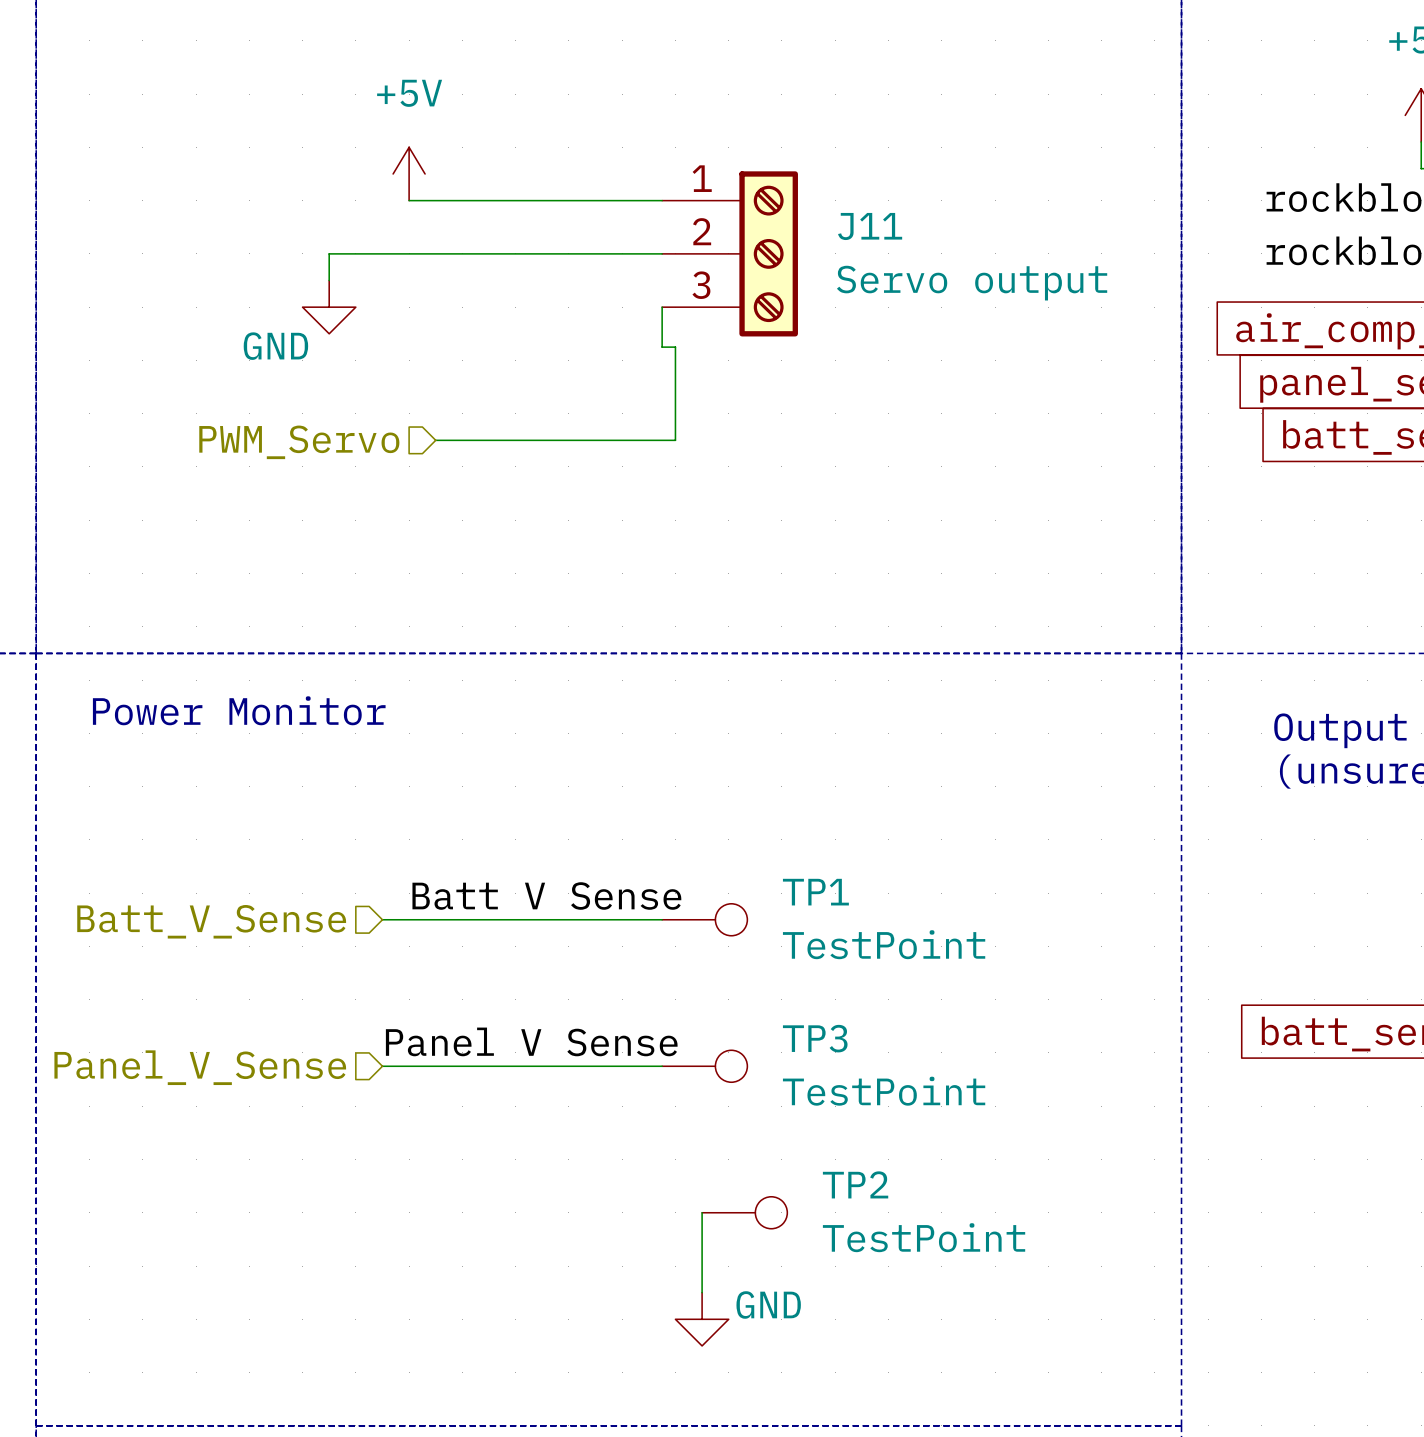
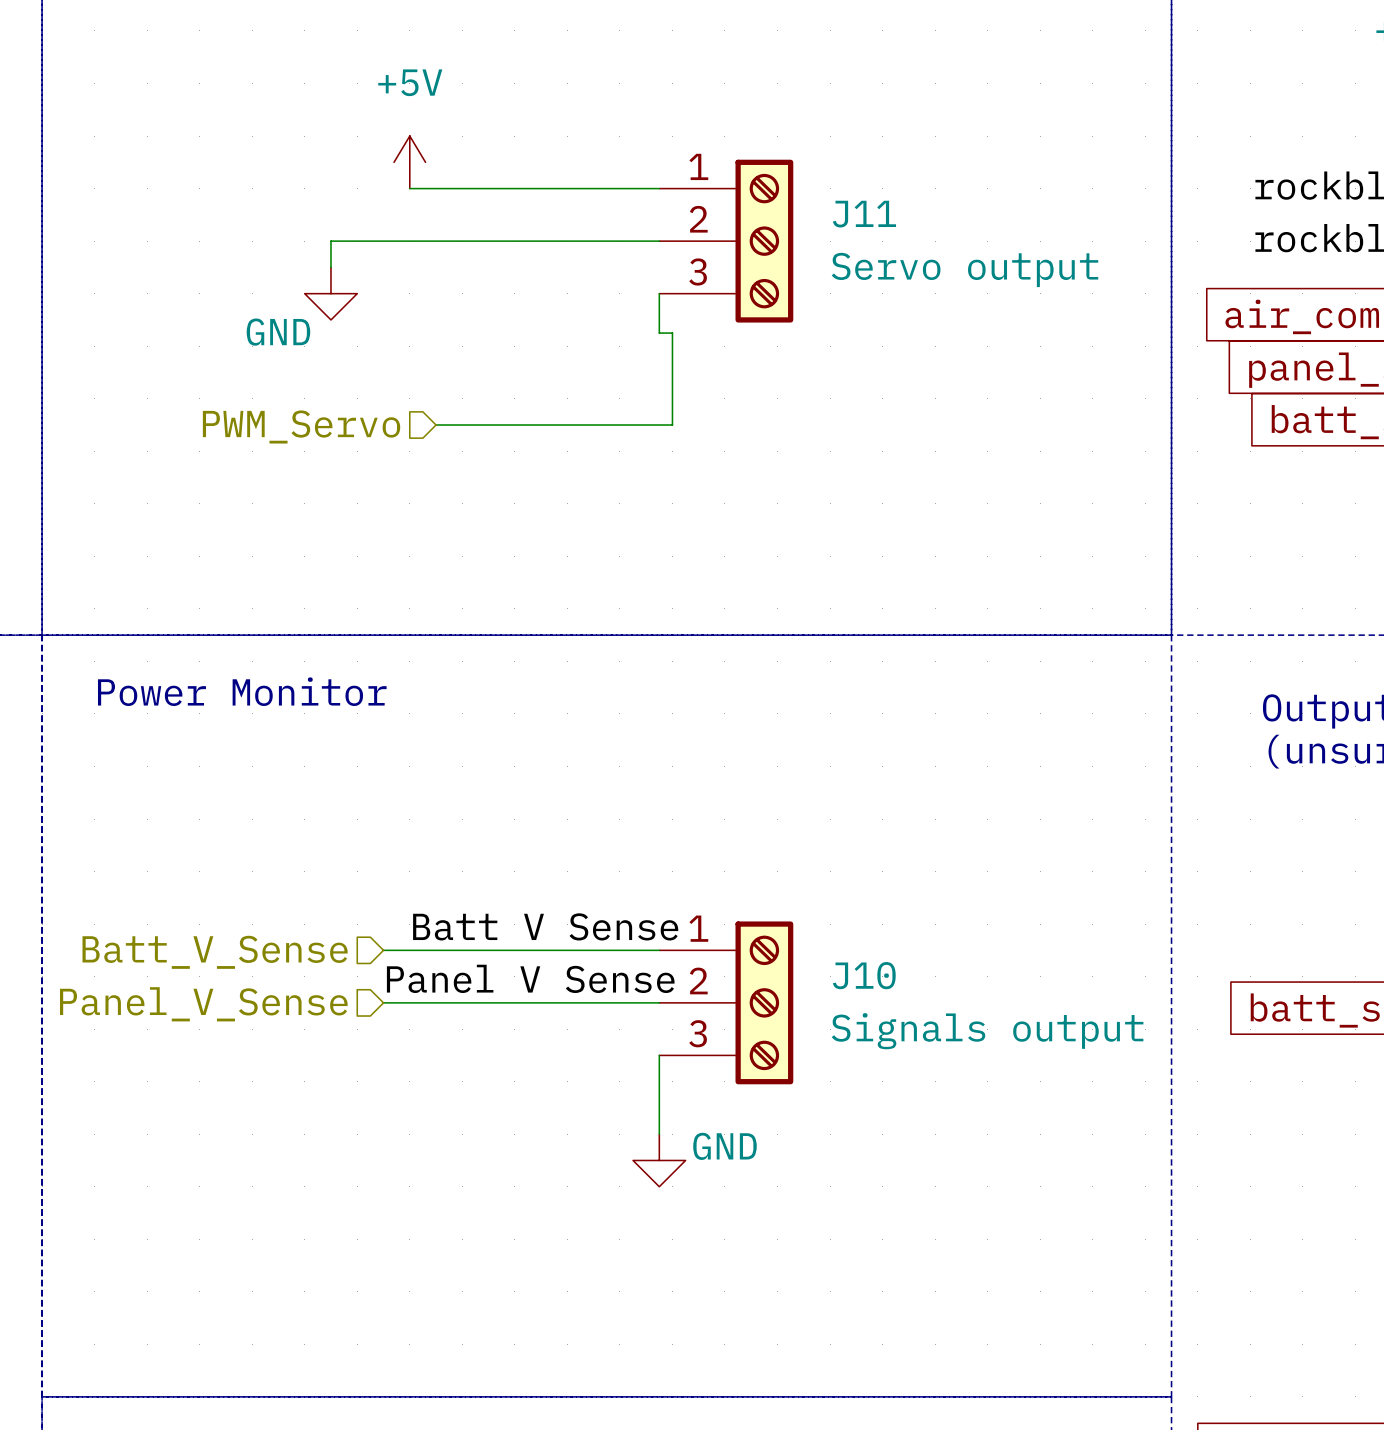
label position: Batt V Sense (546, 896) -> Batt V Sense (545, 926)
wire: (382, 919) (662, 919) -> (383, 950) (659, 950)
TP1: TestPoint (704, 919) -> none
hierarchical label position: Batt_V_Sense (211, 921) -> Batt_V_Sense (215, 952)
J10: none -> Signals output (726, 1002)
label position: Panel V Sense (531, 1041) -> Panel V Sense (530, 978)
wire: (382, 1066) (662, 1066) -> (383, 1002) (659, 1002)
TP3: TestPoint (704, 1066) -> none
hierarchical label position: Panel_V_Sense (200, 1067) -> Panel_V_Sense (203, 1004)
wire: (702, 1212) (702, 1292) -> (659, 1055) (659, 1134)
TP2: TestPoint (744, 1212) -> none
power symbol position: GND (702, 1319) -> GND (659, 1160)

